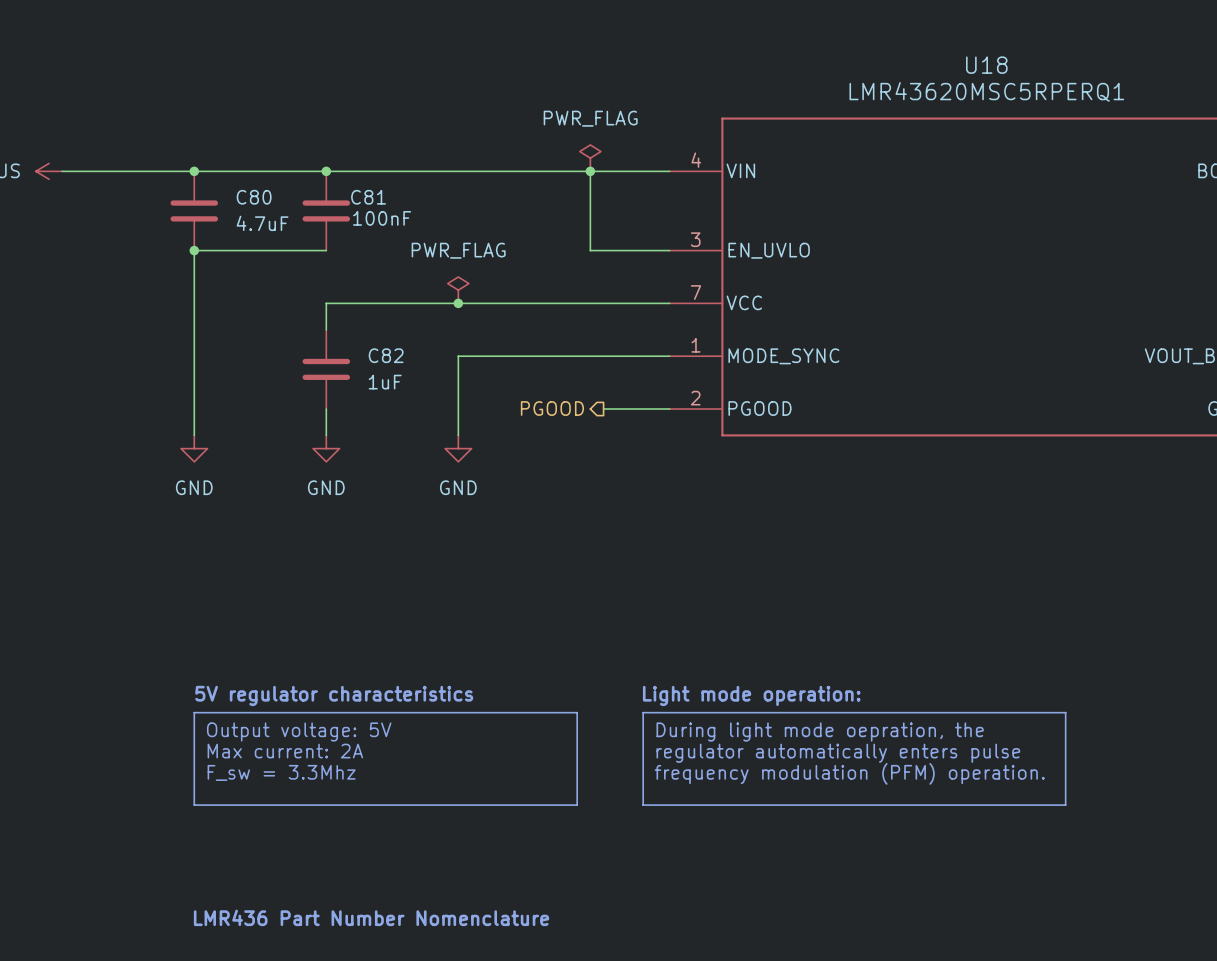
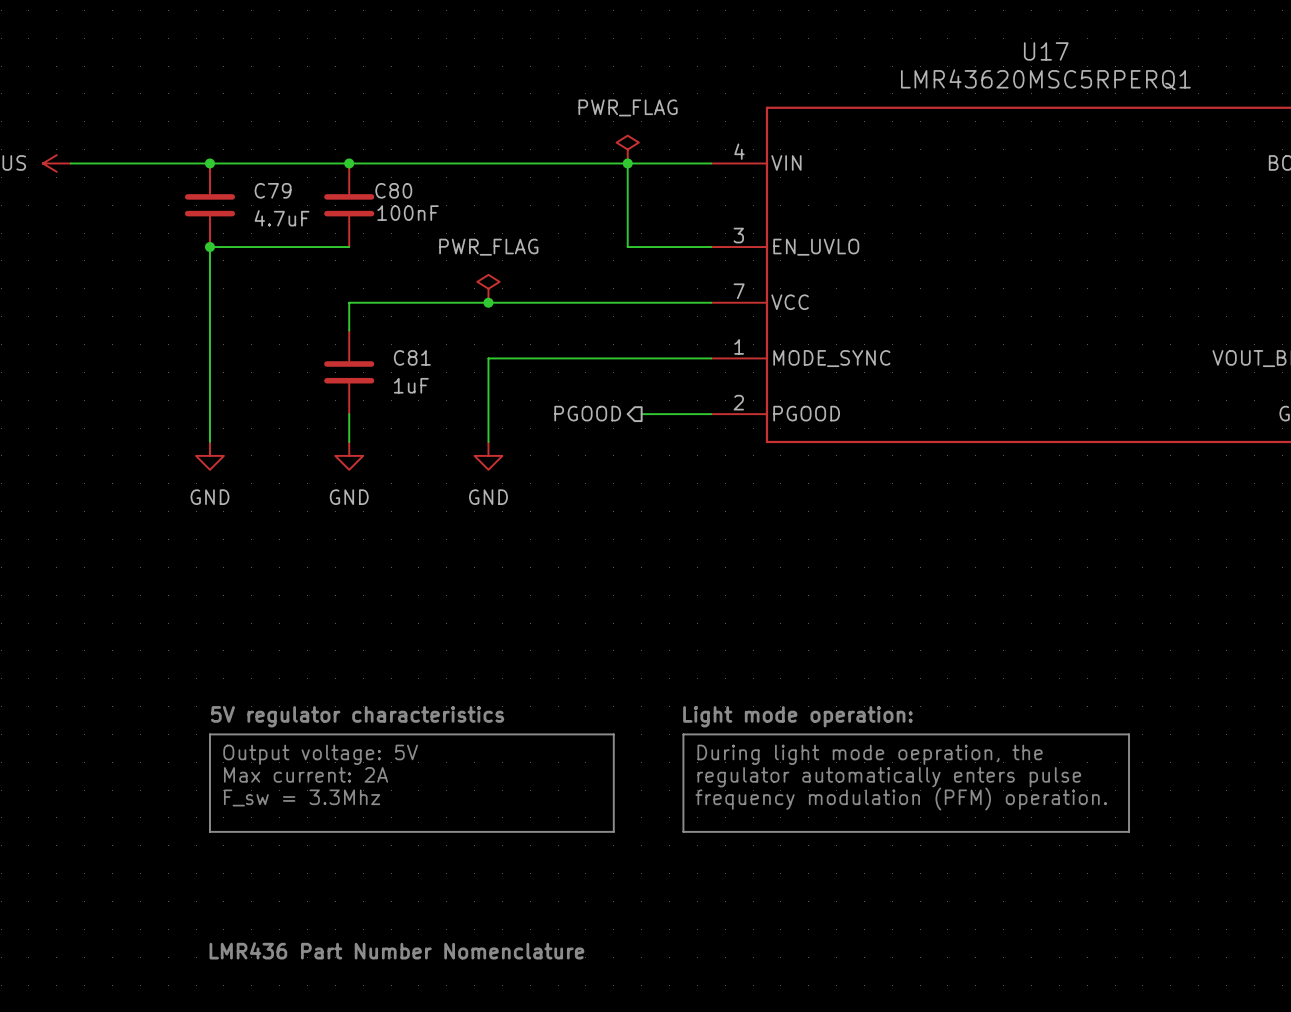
U18 name: U18 (986, 65) -> U17 (1046, 51)
C80 name: C80 (254, 197) -> C79 (273, 190)
C81 name: C81 (368, 197) -> C80 (393, 190)
C82 name: C82 (386, 355) -> C81 (412, 357)

